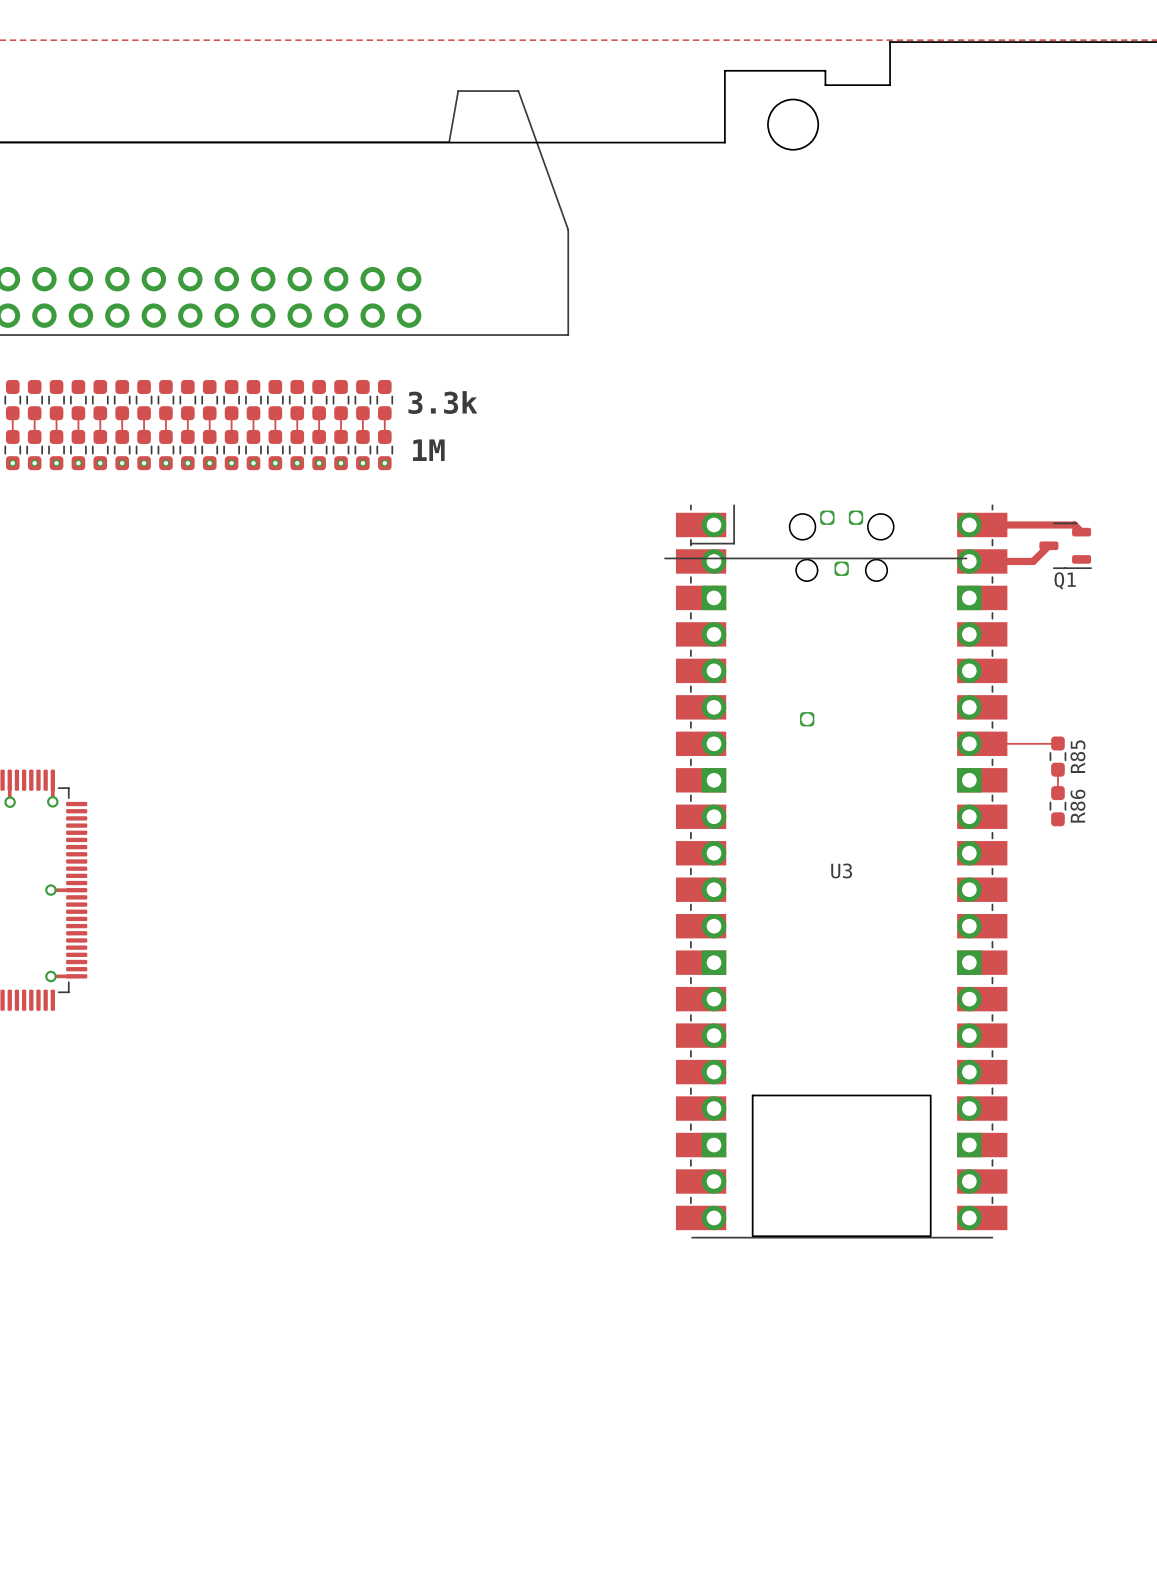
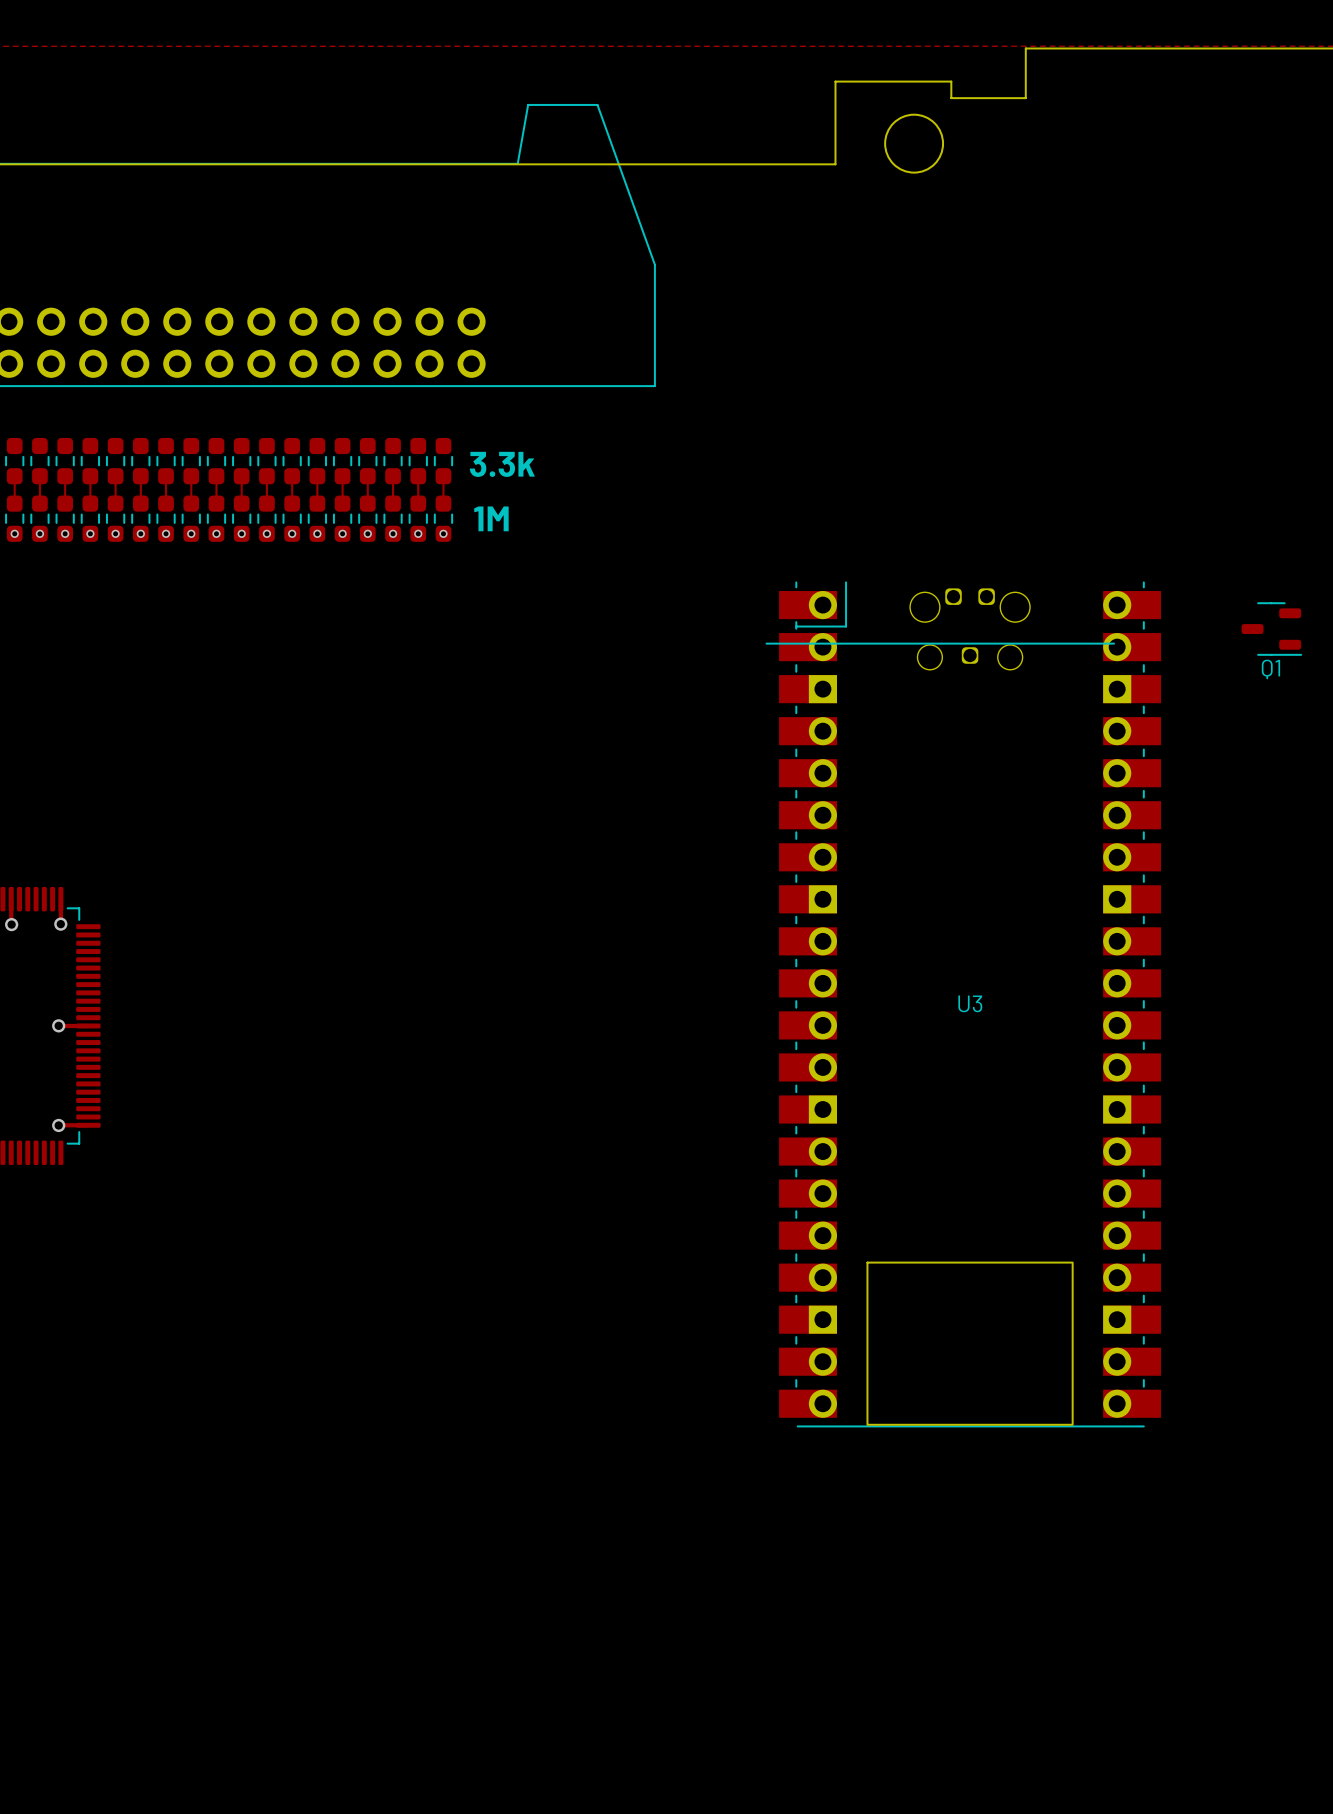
U3 footprint: [664, 504, 1008, 1239] -> [765, 581, 1162, 1428]
track: (969, 524) (1074, 524) (1081, 532) -> none
track: (1048, 545) (1033, 561) (969, 561) -> none
Q1 position: (1065, 545) -> (1271, 629)
track: (1057, 743) (969, 743) -> none
R85: (1057, 756) -> none
track: (1057, 769) (1057, 793) -> none
R86: (1057, 806) -> none

